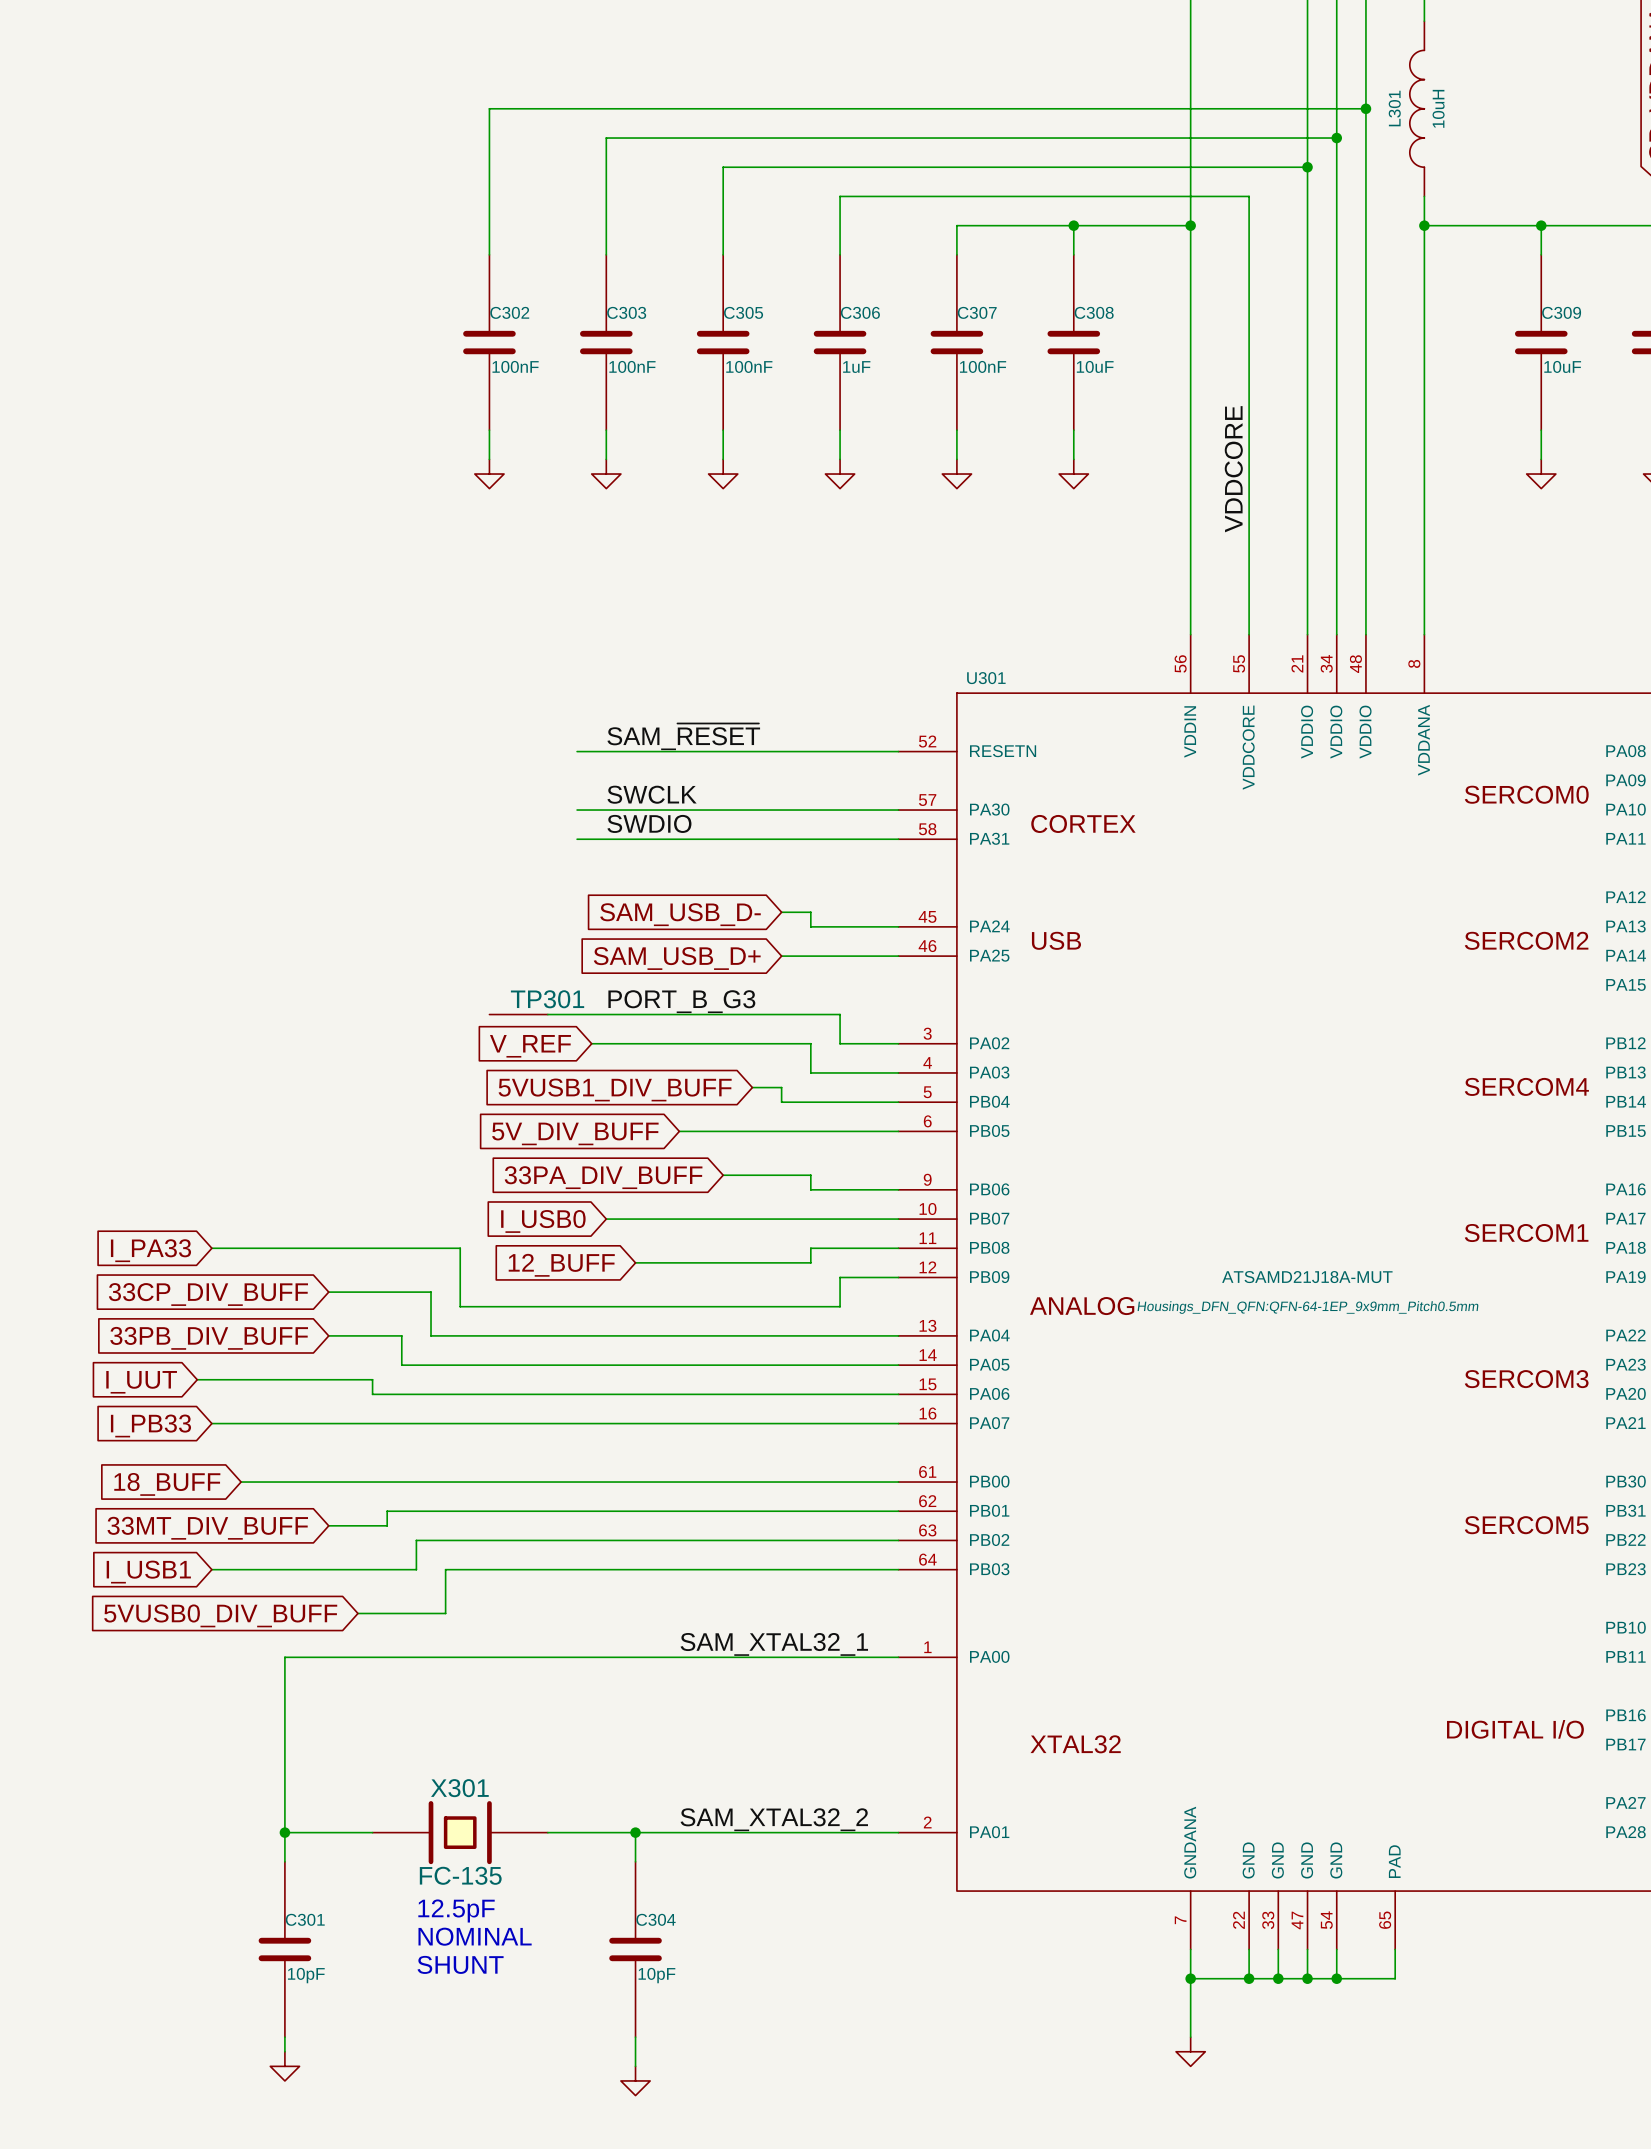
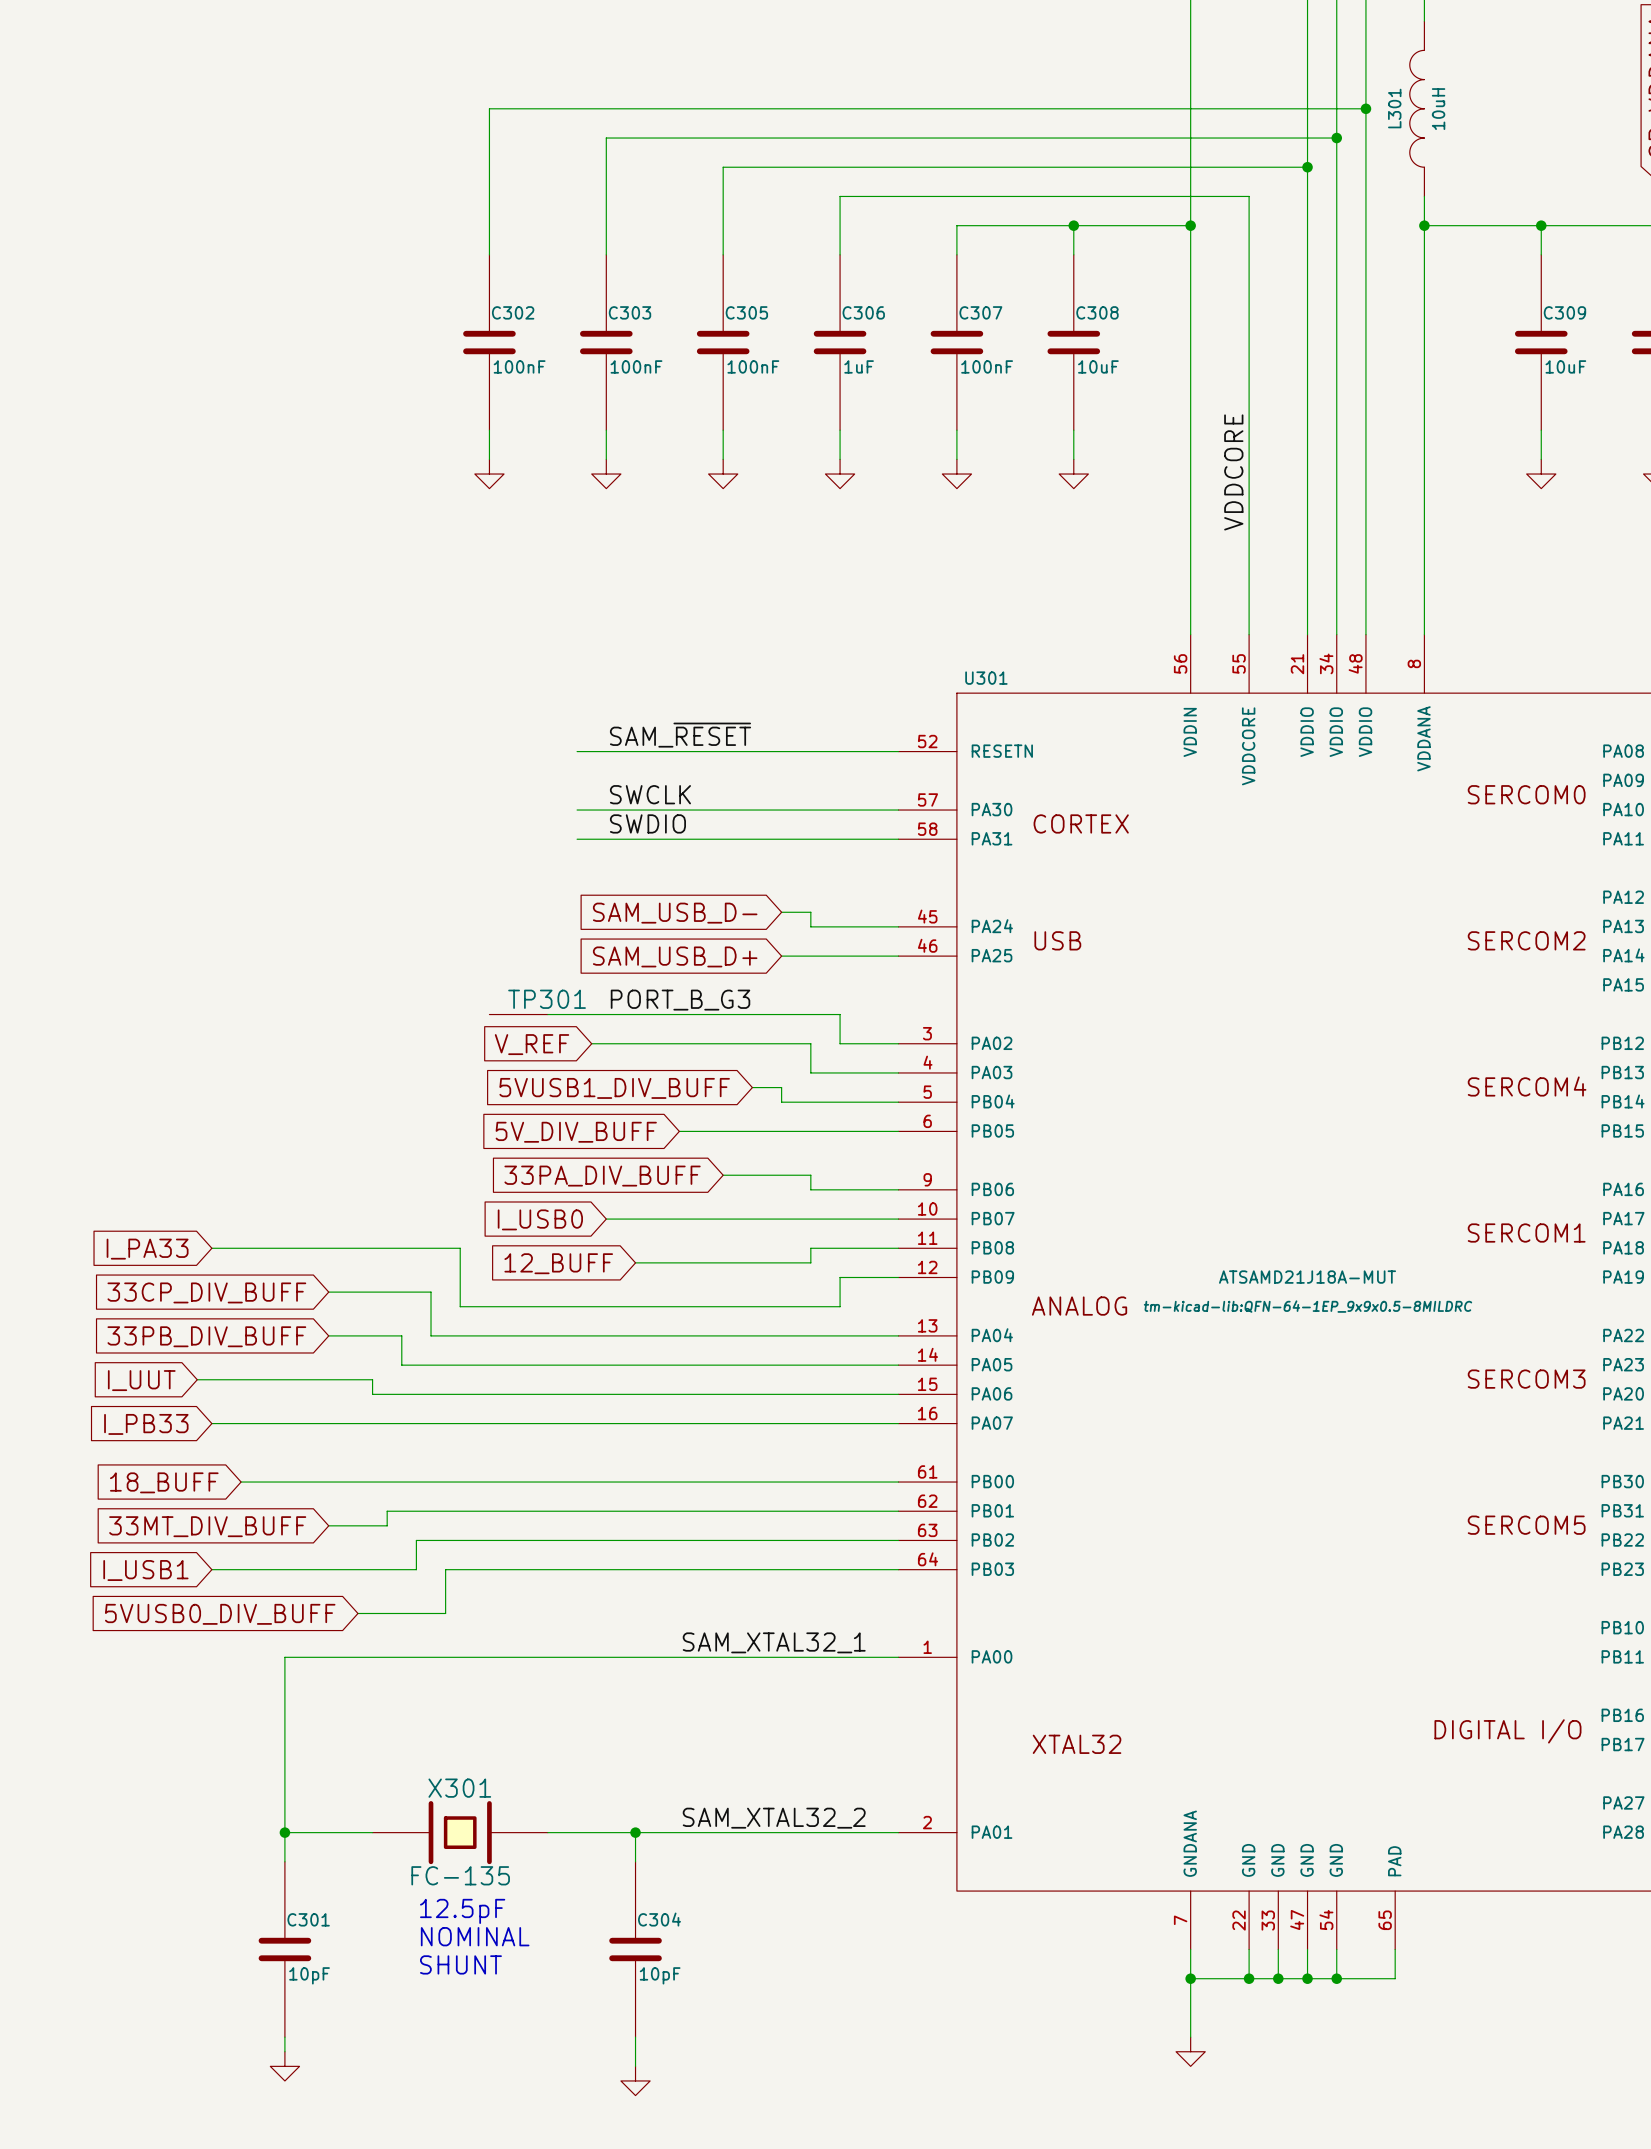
U301 text: Housings_DFN_QFN:QFN-64-1EP_9x9mm_Pitch0.5mm (1308, 1307) -> tm-kicad-lib:QFN-64-1EP_9x9x0.5-8MILDRC (1308, 1306)

